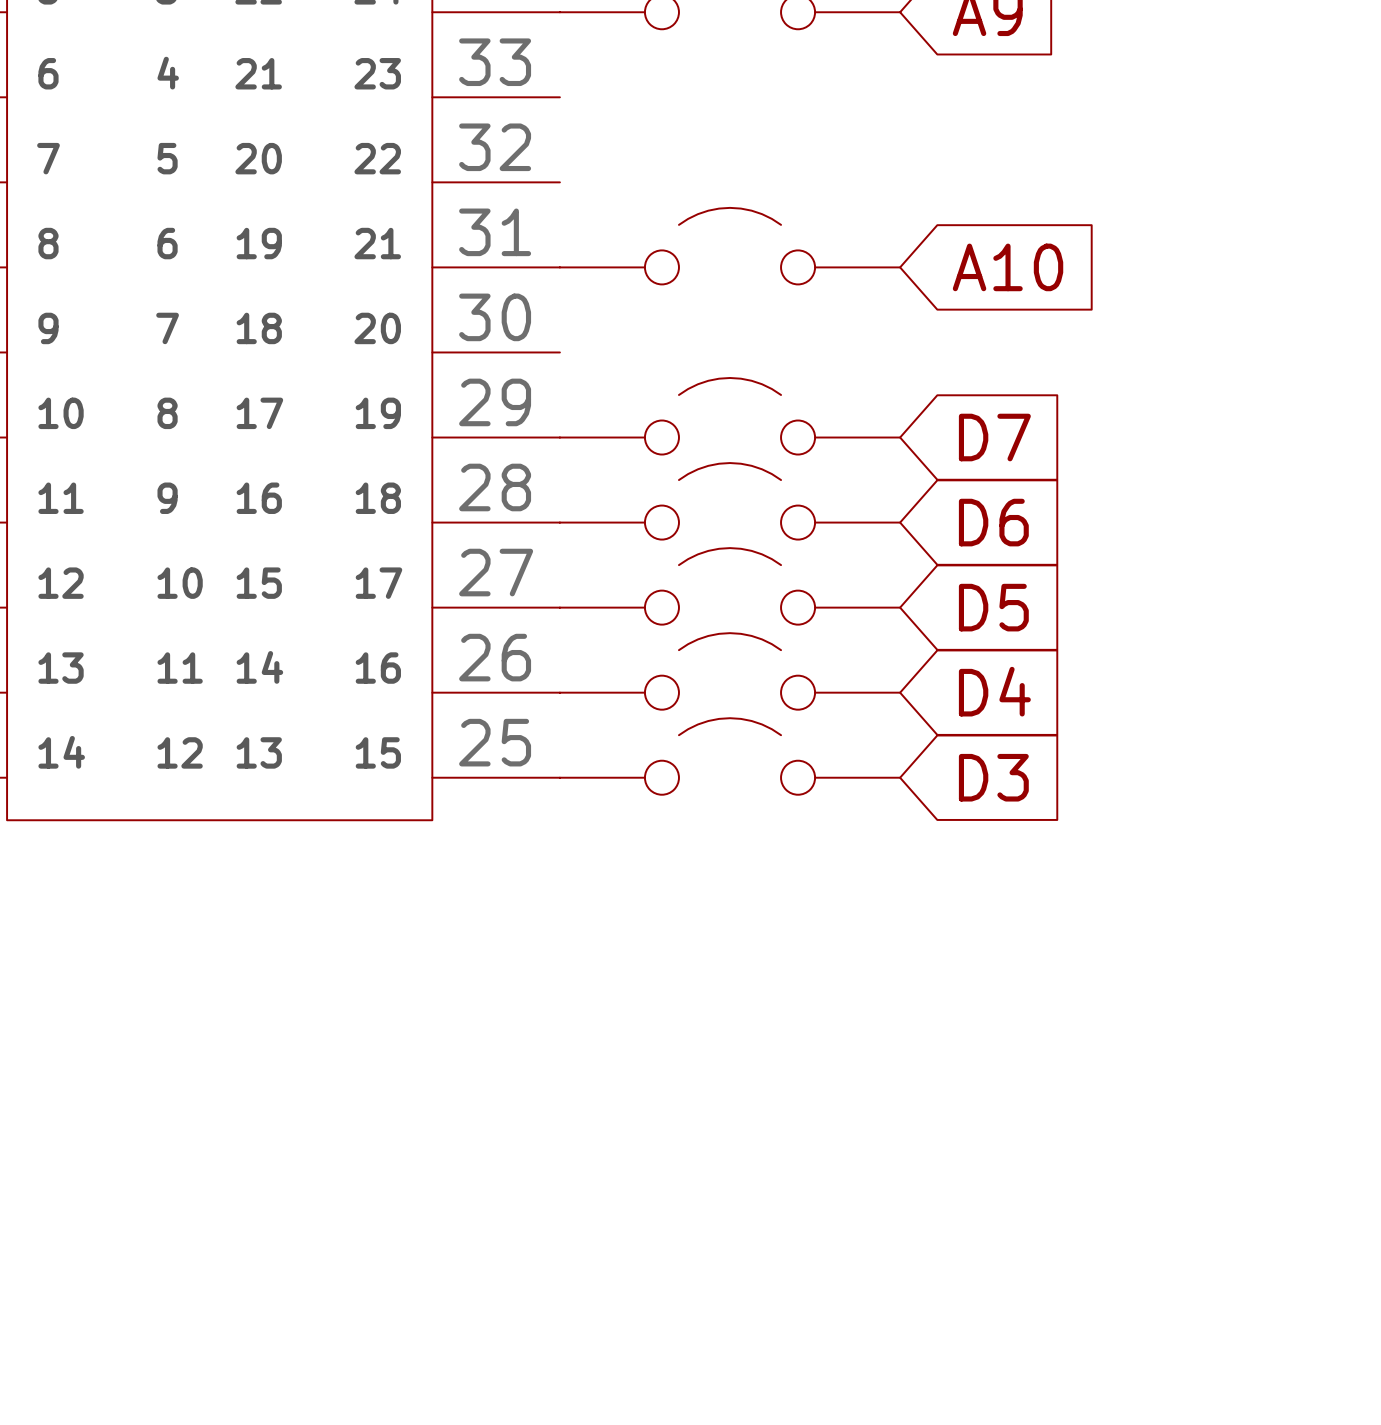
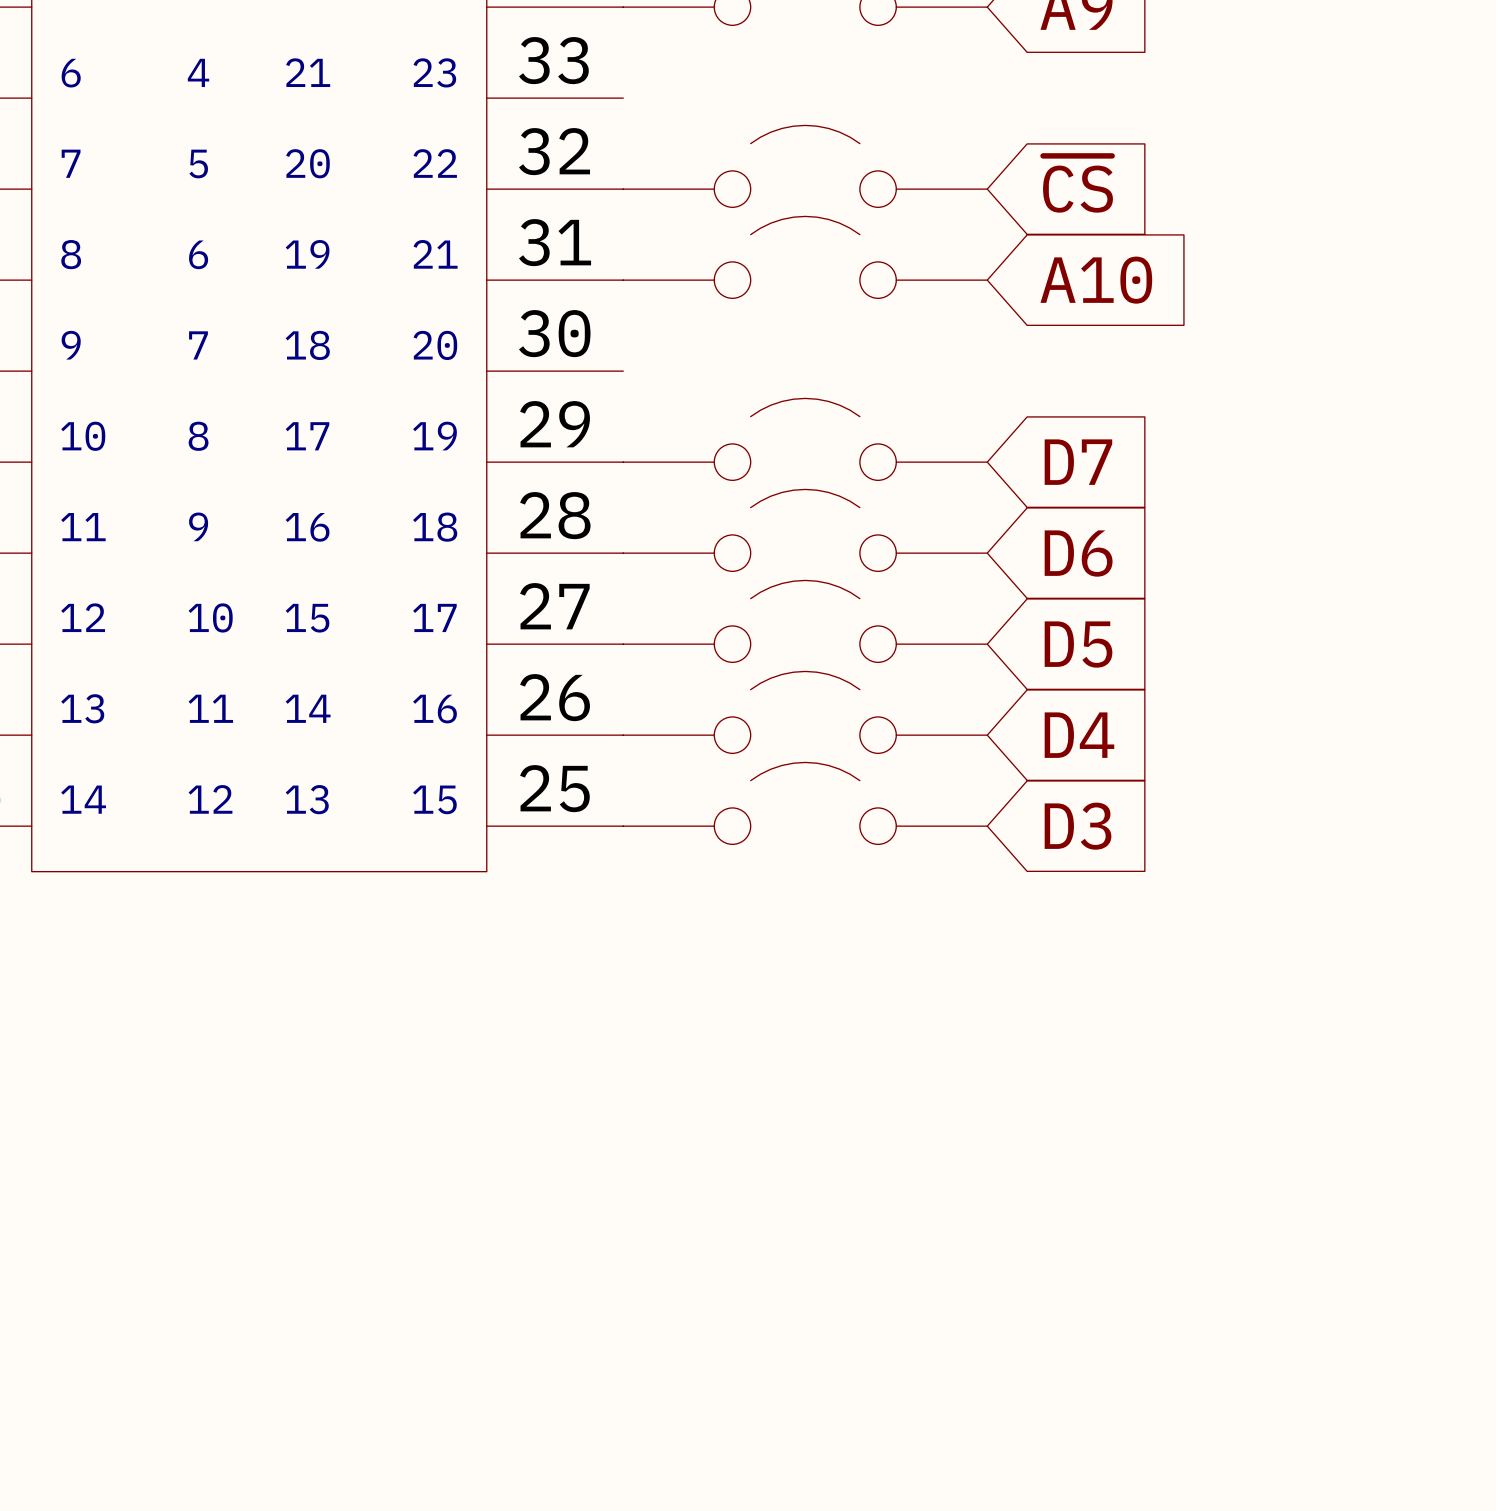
part: none -> (805, 166)
global label: none -> ~{CS} (1077, 184)

